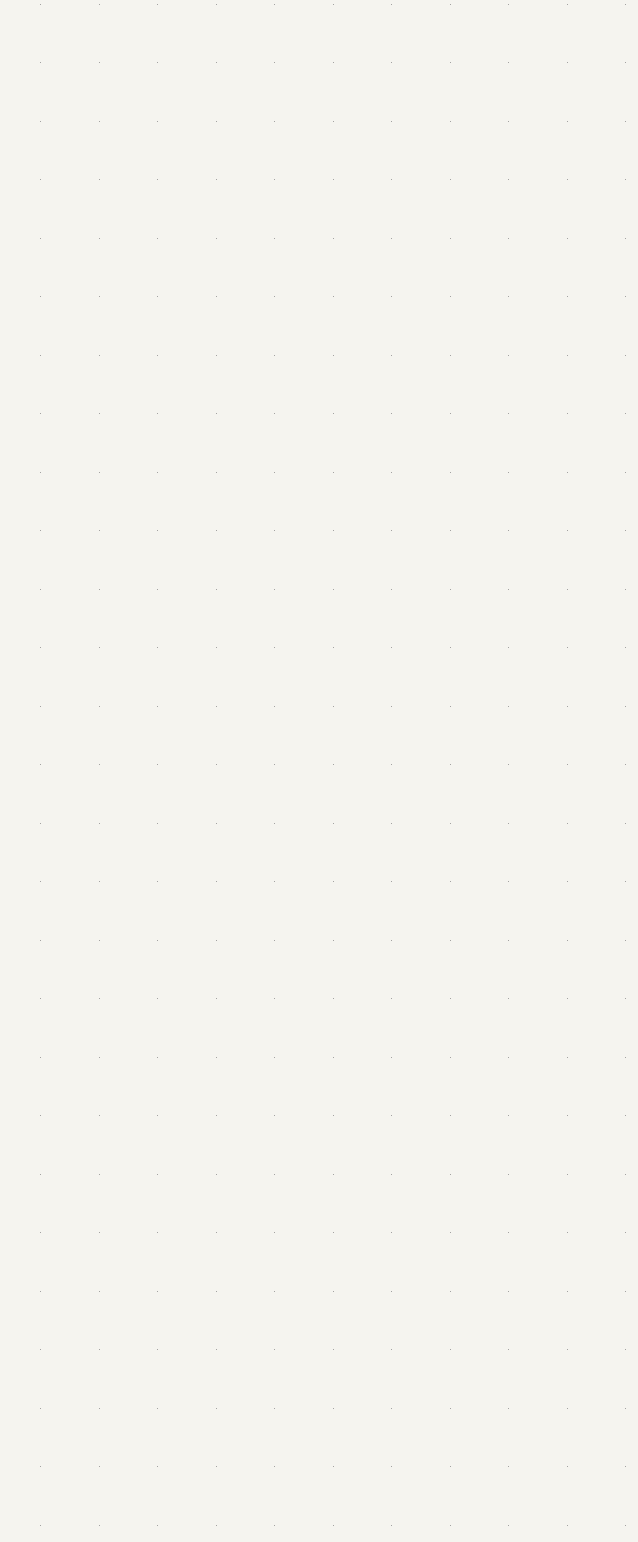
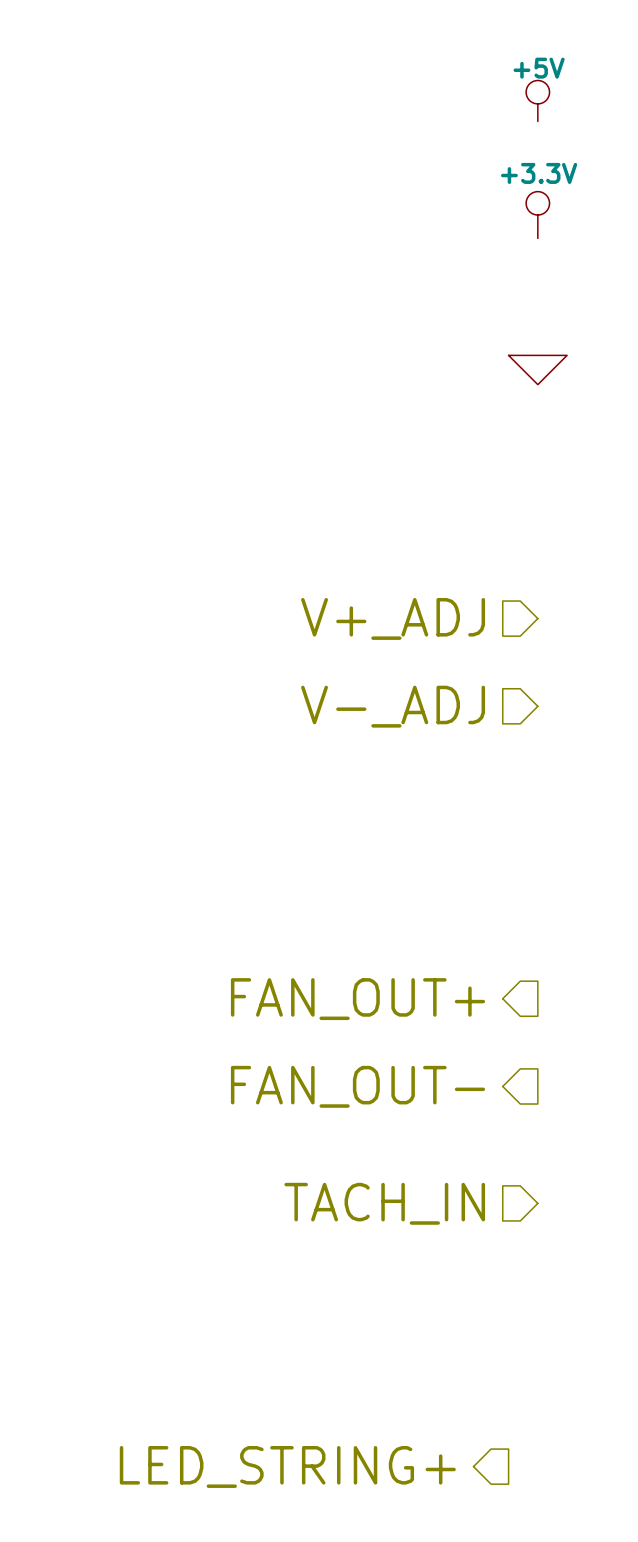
power symbol: none -> +5V (537, 100)
power symbol: none -> +3.3V (537, 215)
power symbol: none -> (537, 370)
hierarchical label: none -> V+_ADJ (393, 618)
hierarchical label: none -> V-_ADJ (393, 706)
hierarchical label: none -> FAN_OUT+ (357, 999)
hierarchical label: none -> FAN_OUT- (357, 1086)
hierarchical label: none -> TACH_IN (384, 1203)
hierarchical label: none -> LED_STRING+ (287, 1466)

